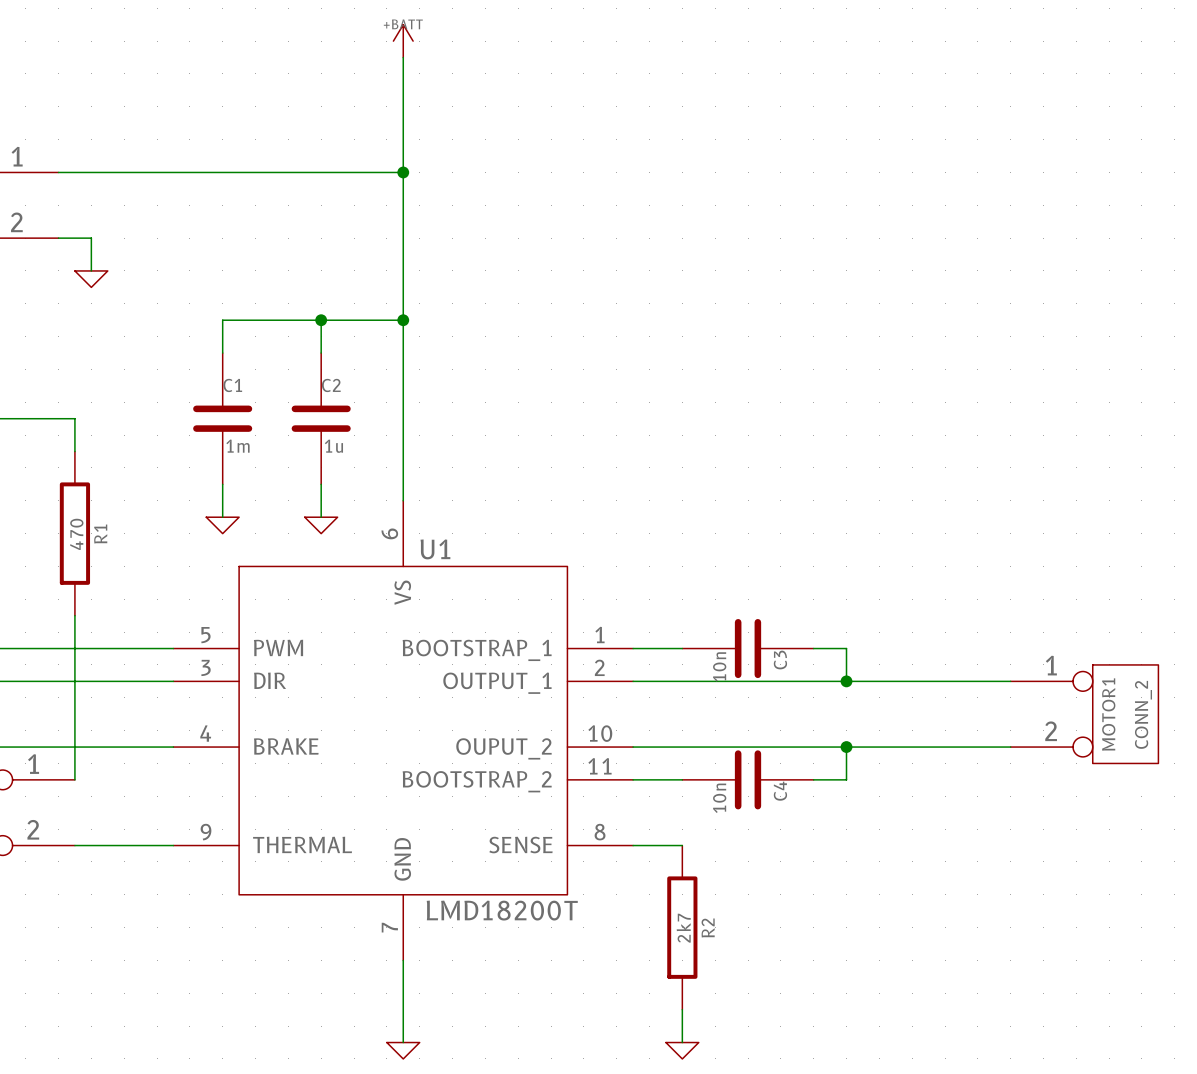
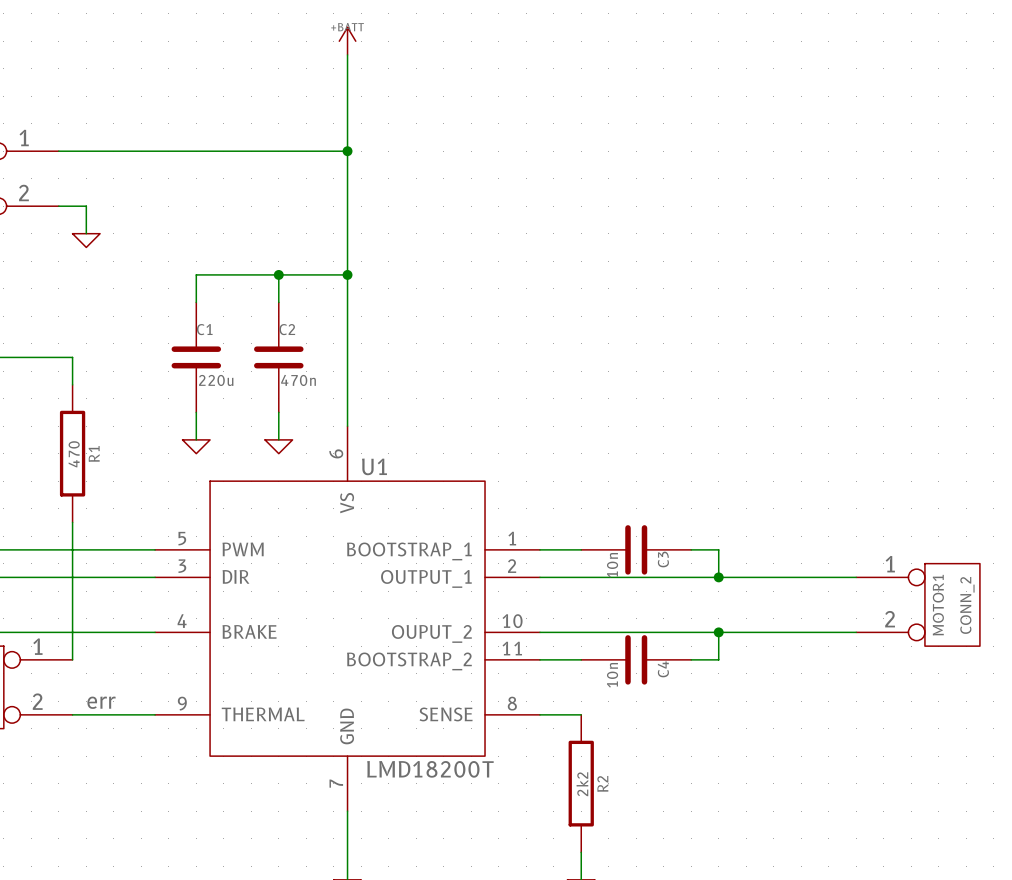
C1 value: 1m (237, 446) -> 220u (216, 380)
C2 value: 1u (333, 446) -> 470n (298, 380)
label: none -> err (101, 702)
R2 value: 2k7 (683, 928) -> 2k2 (582, 784)

